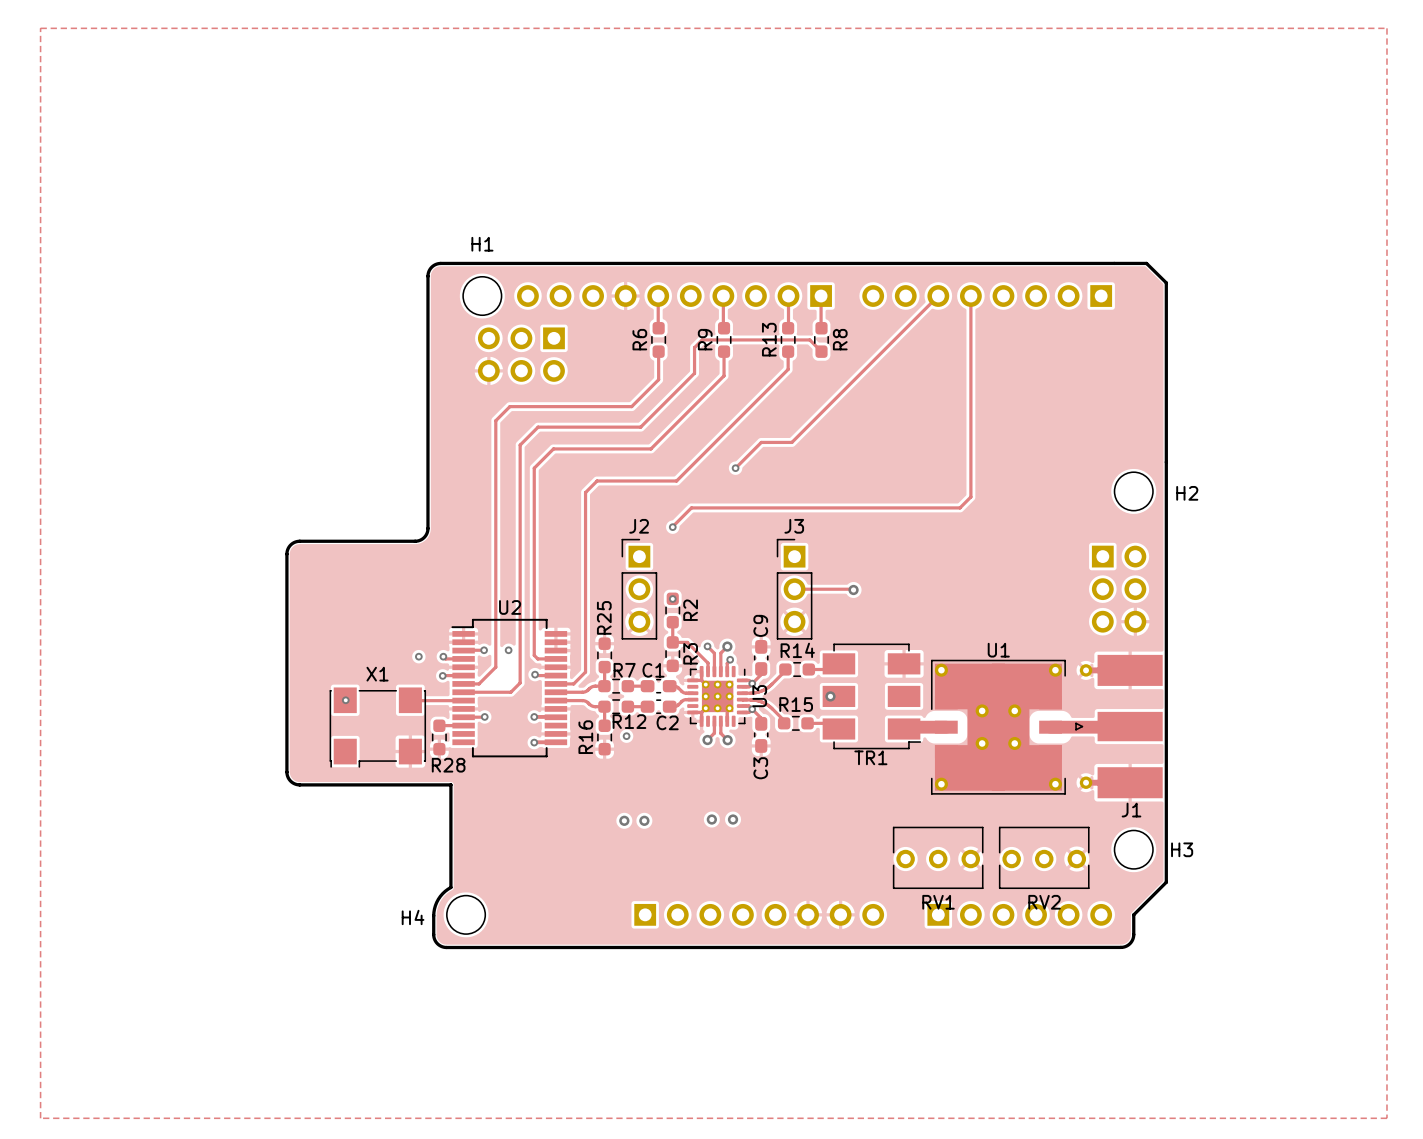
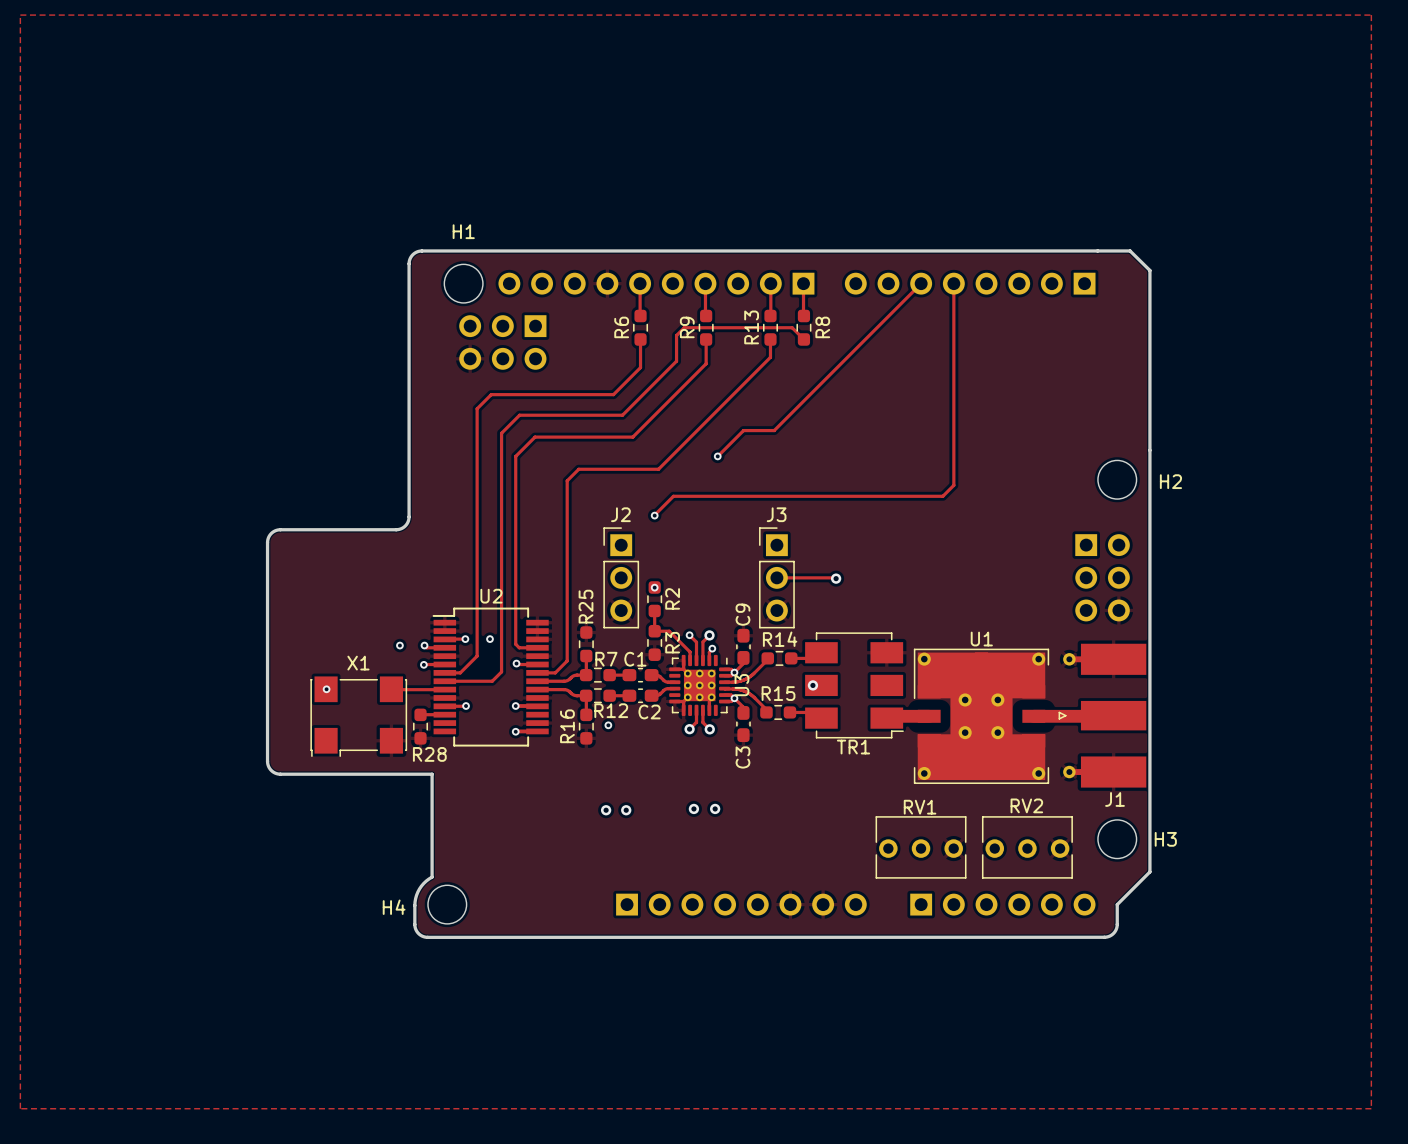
RV1 name position: RV1 (938, 902) -> RV1 (920, 807)
RV2 name position: RV2 (1044, 902) -> RV2 (1026, 805)

